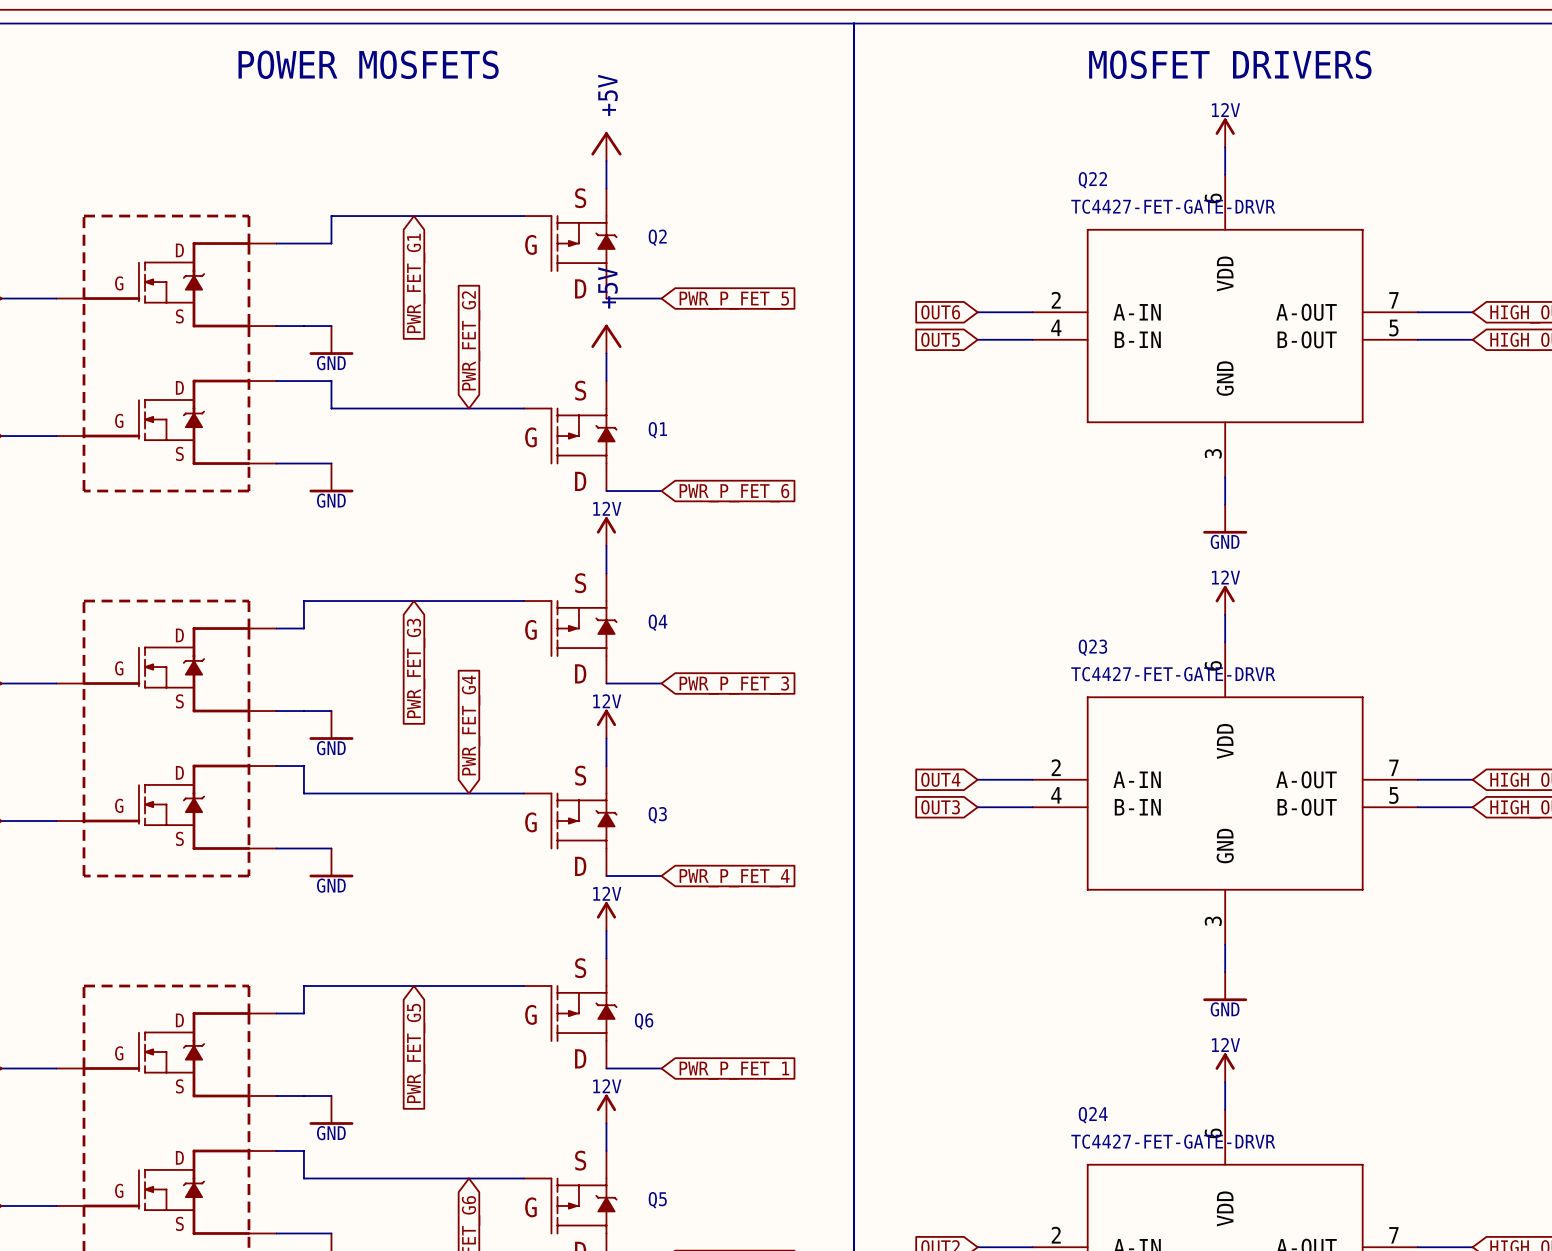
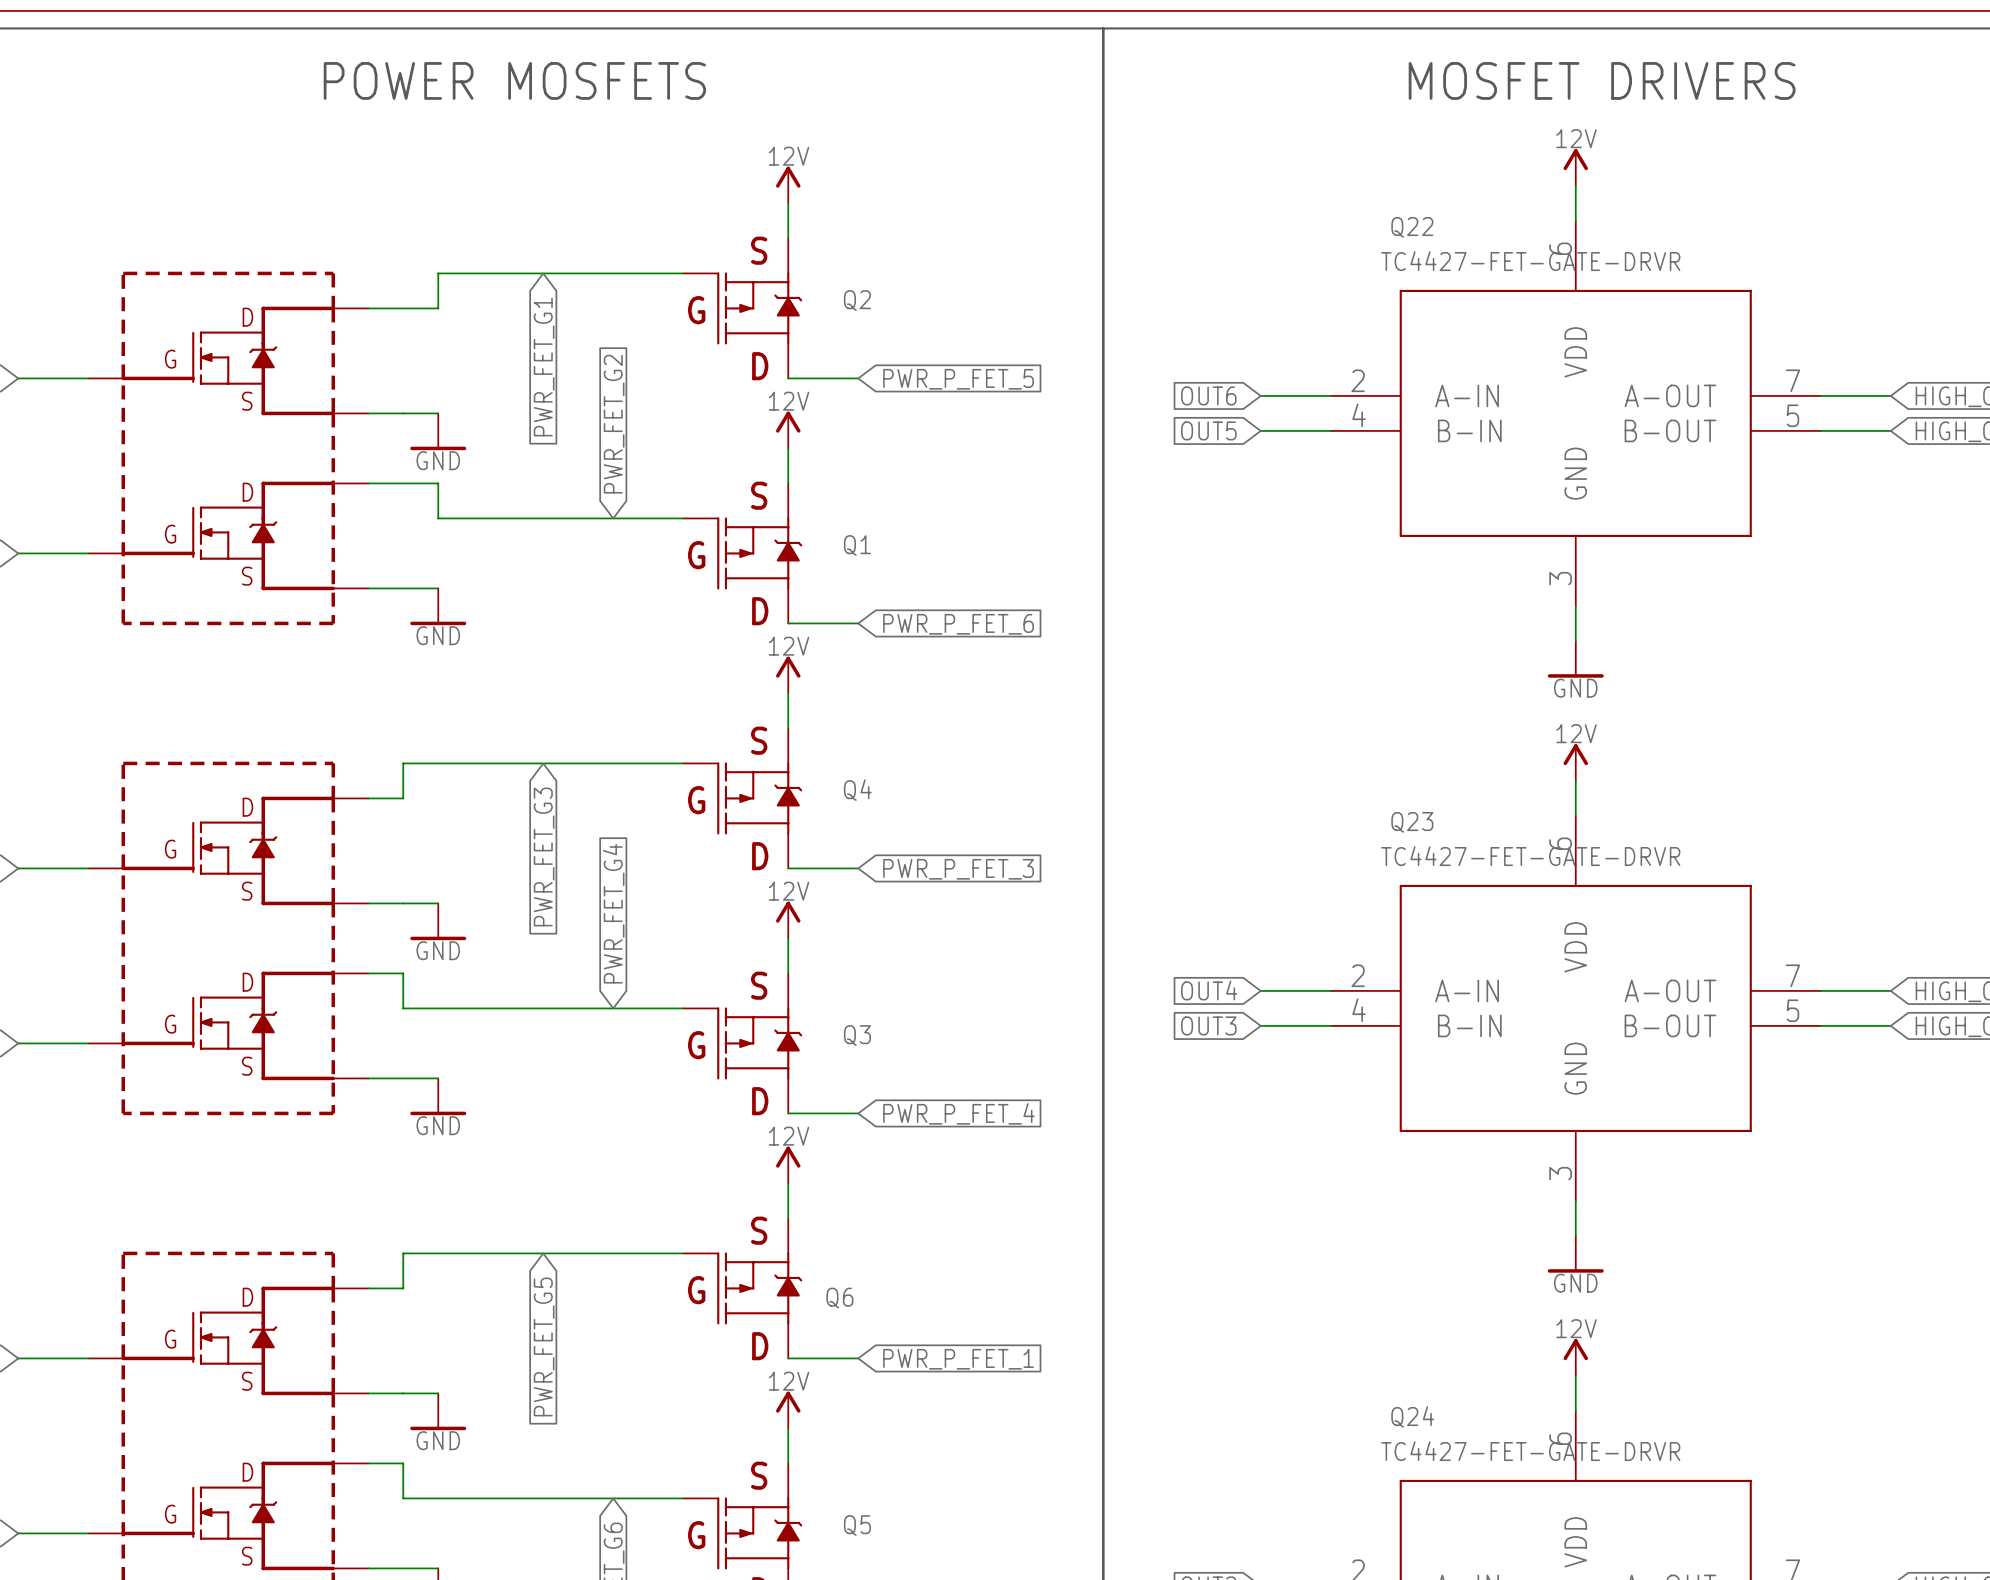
power symbol: +5V (606, 146) -> 12V (788, 185)
power symbol: +5V (606, 339) -> 12V (788, 430)

